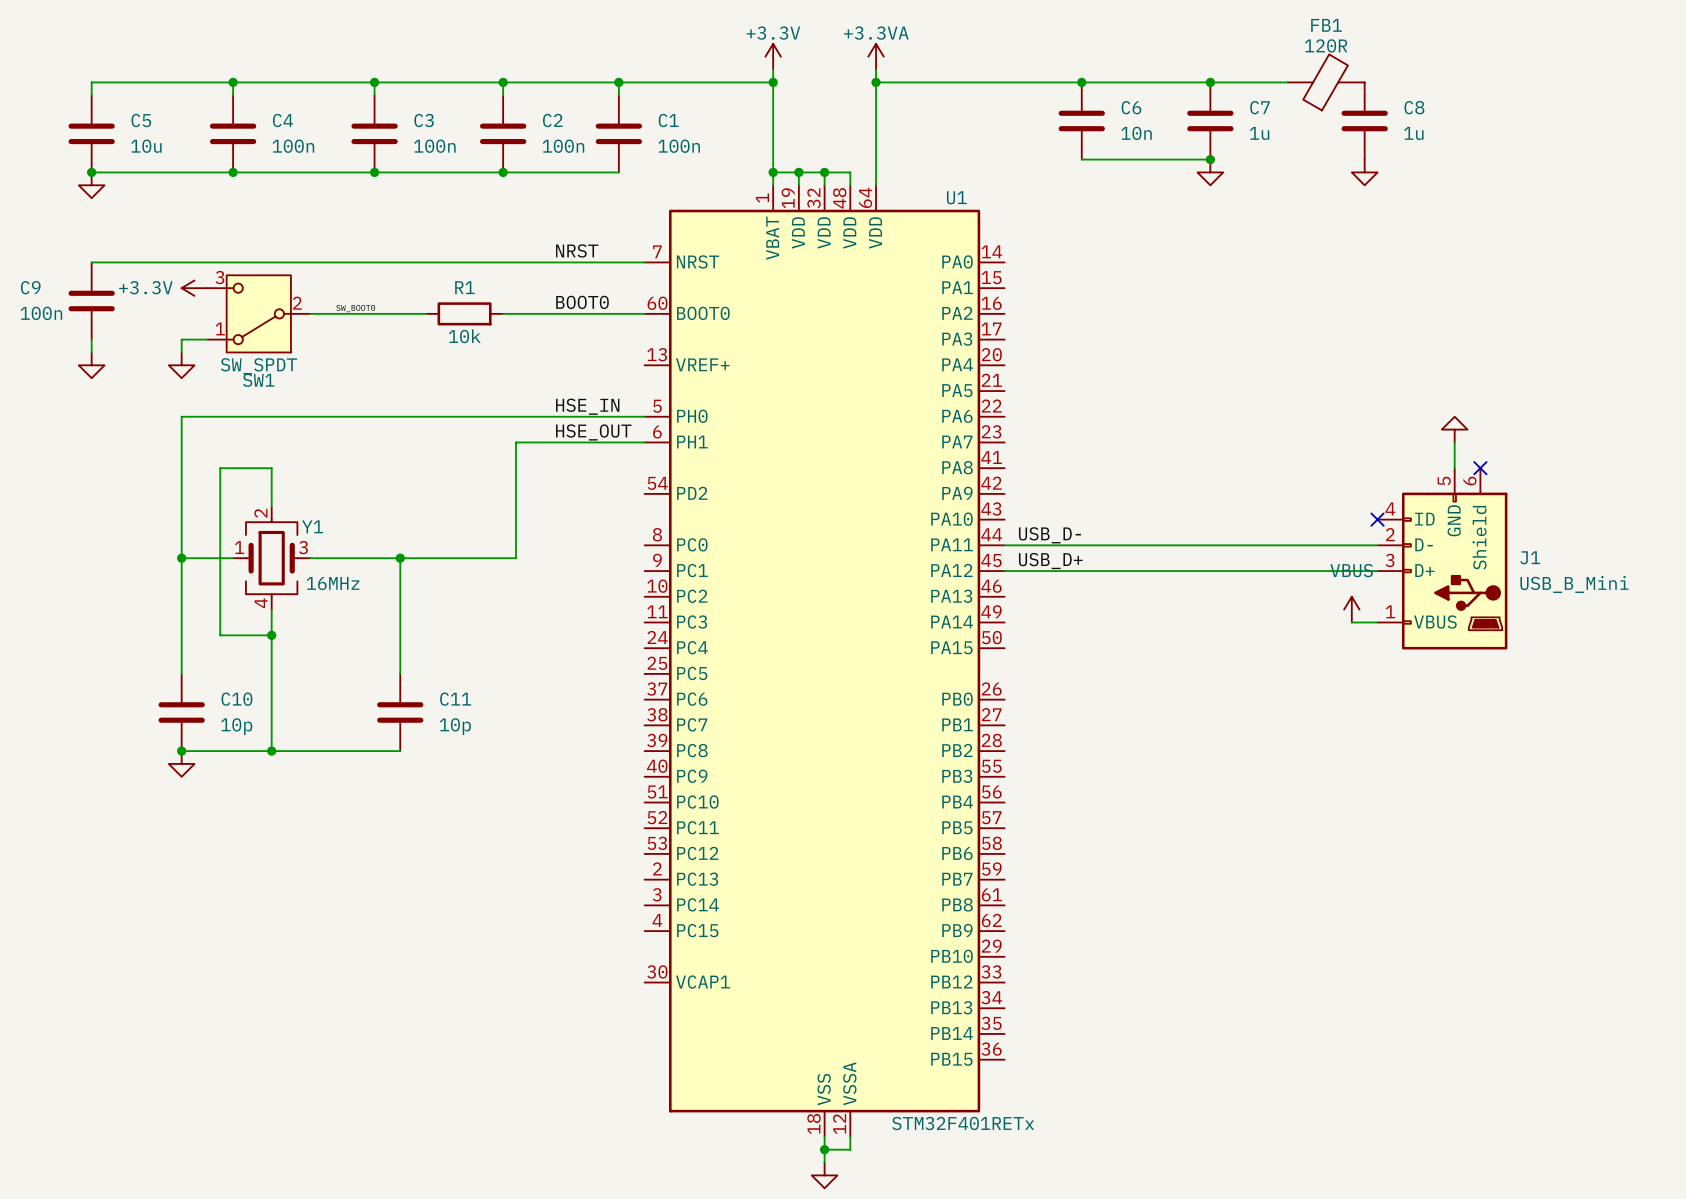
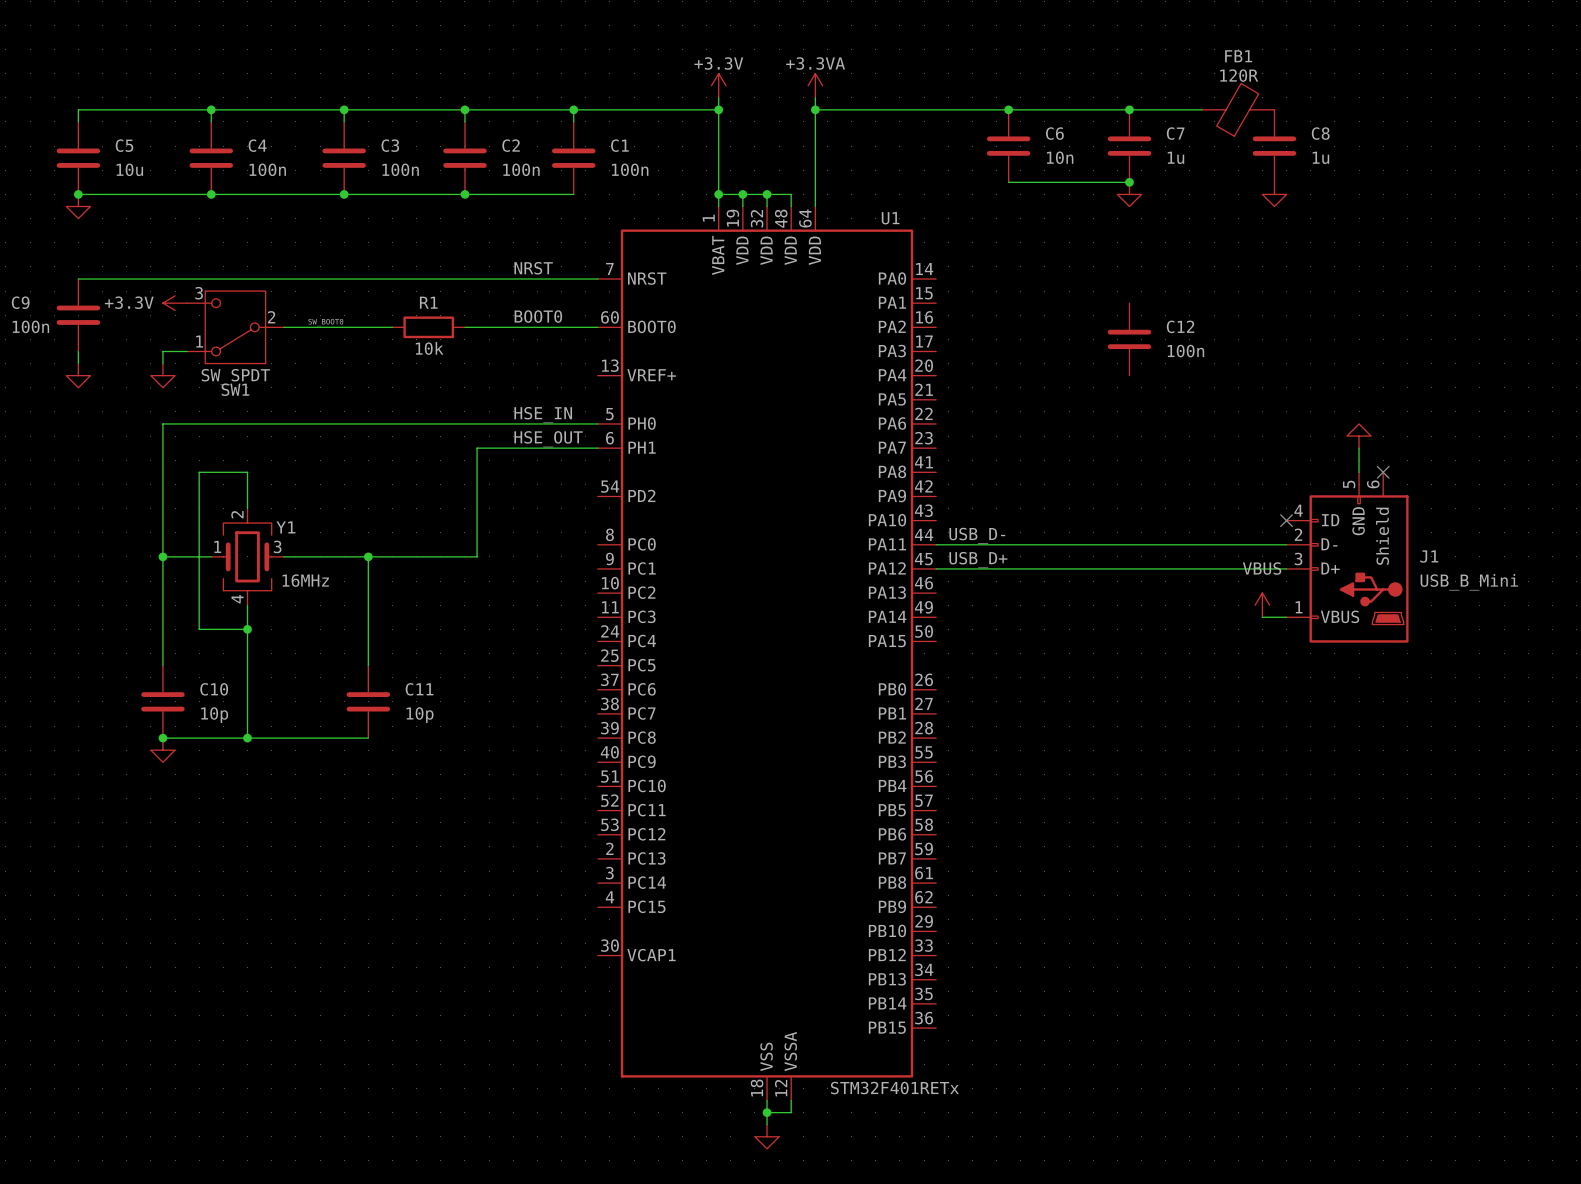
C12: none -> 100n (1129, 339)

